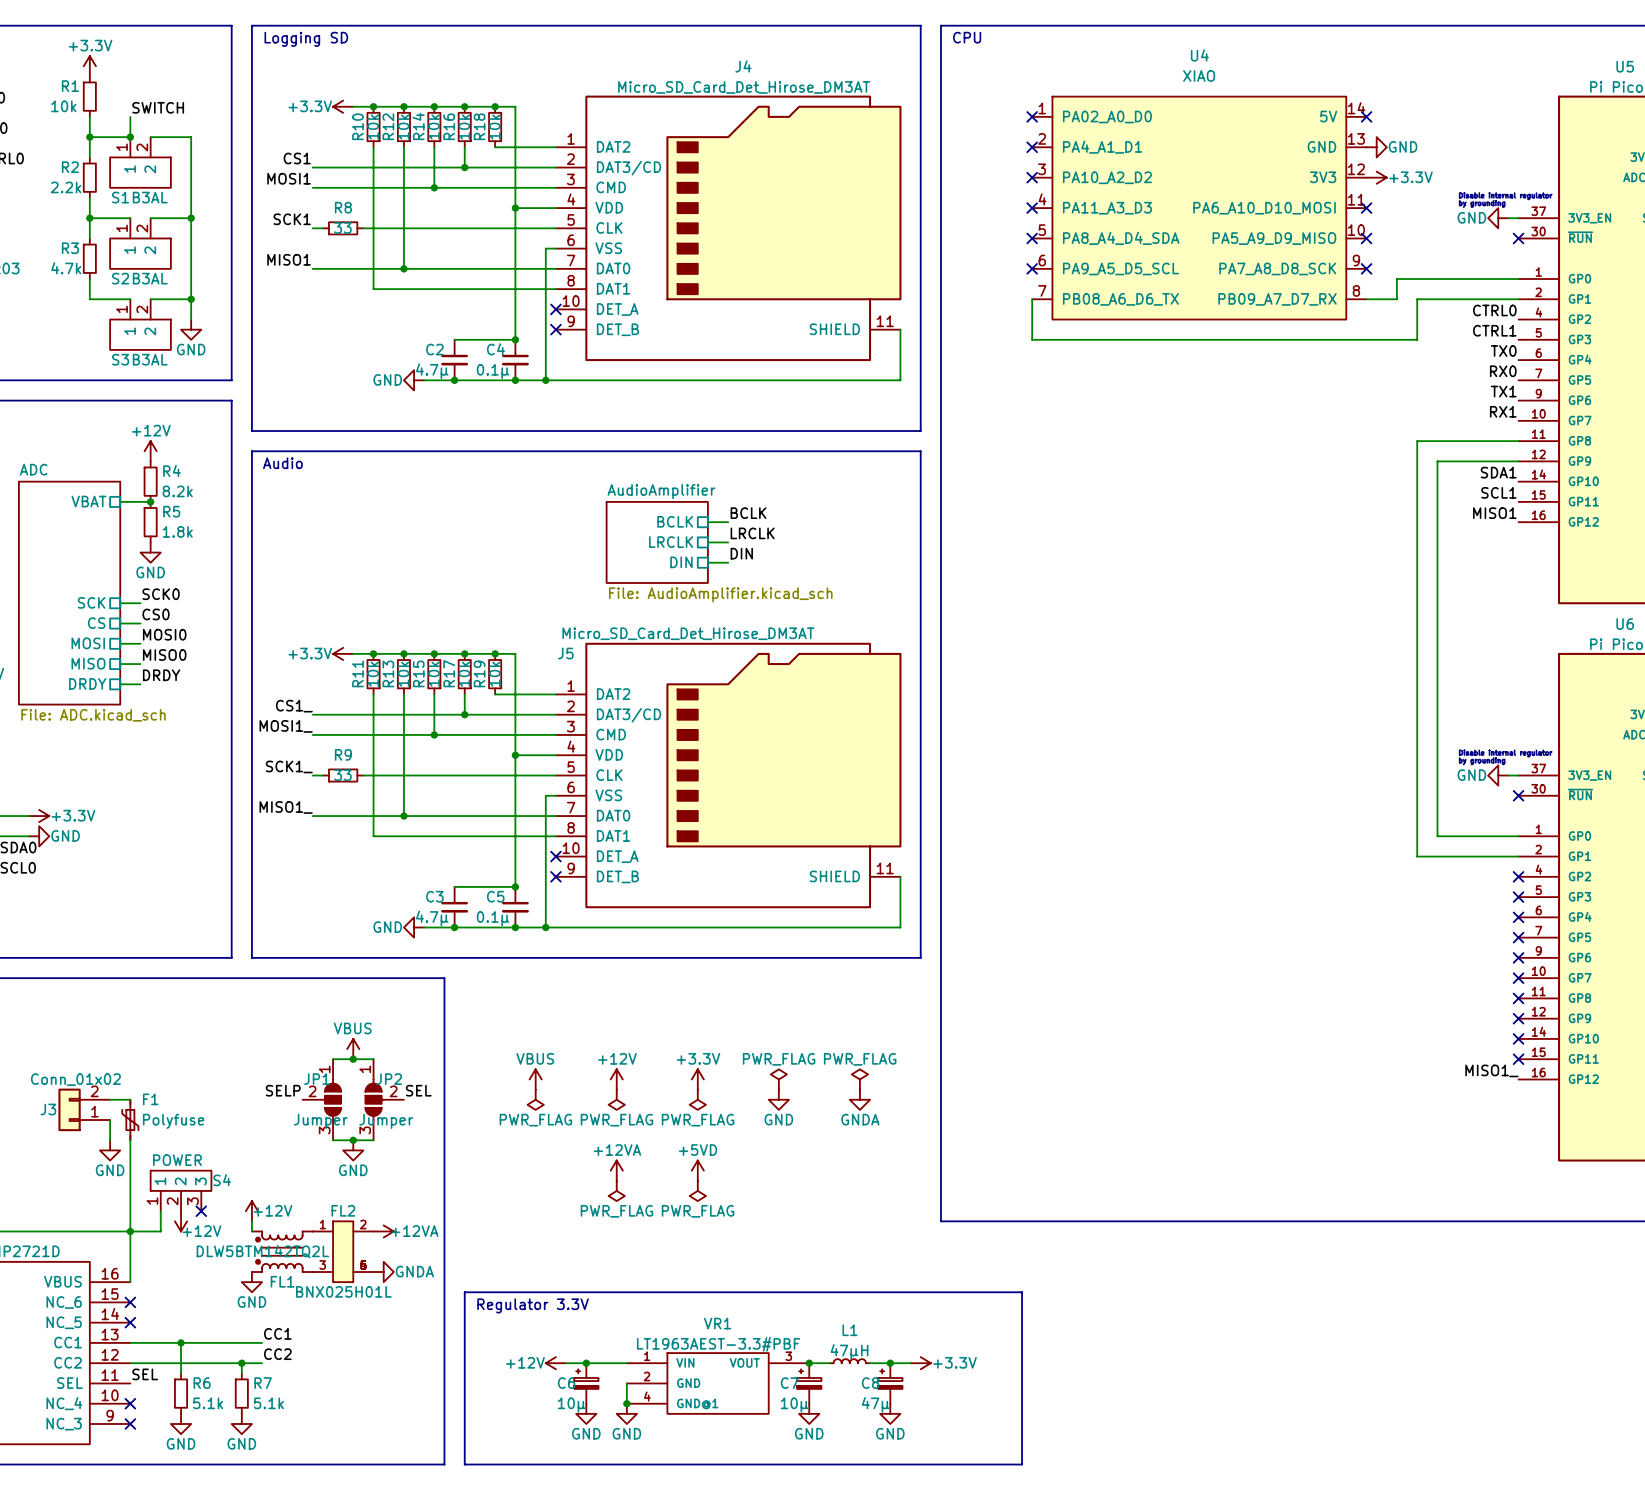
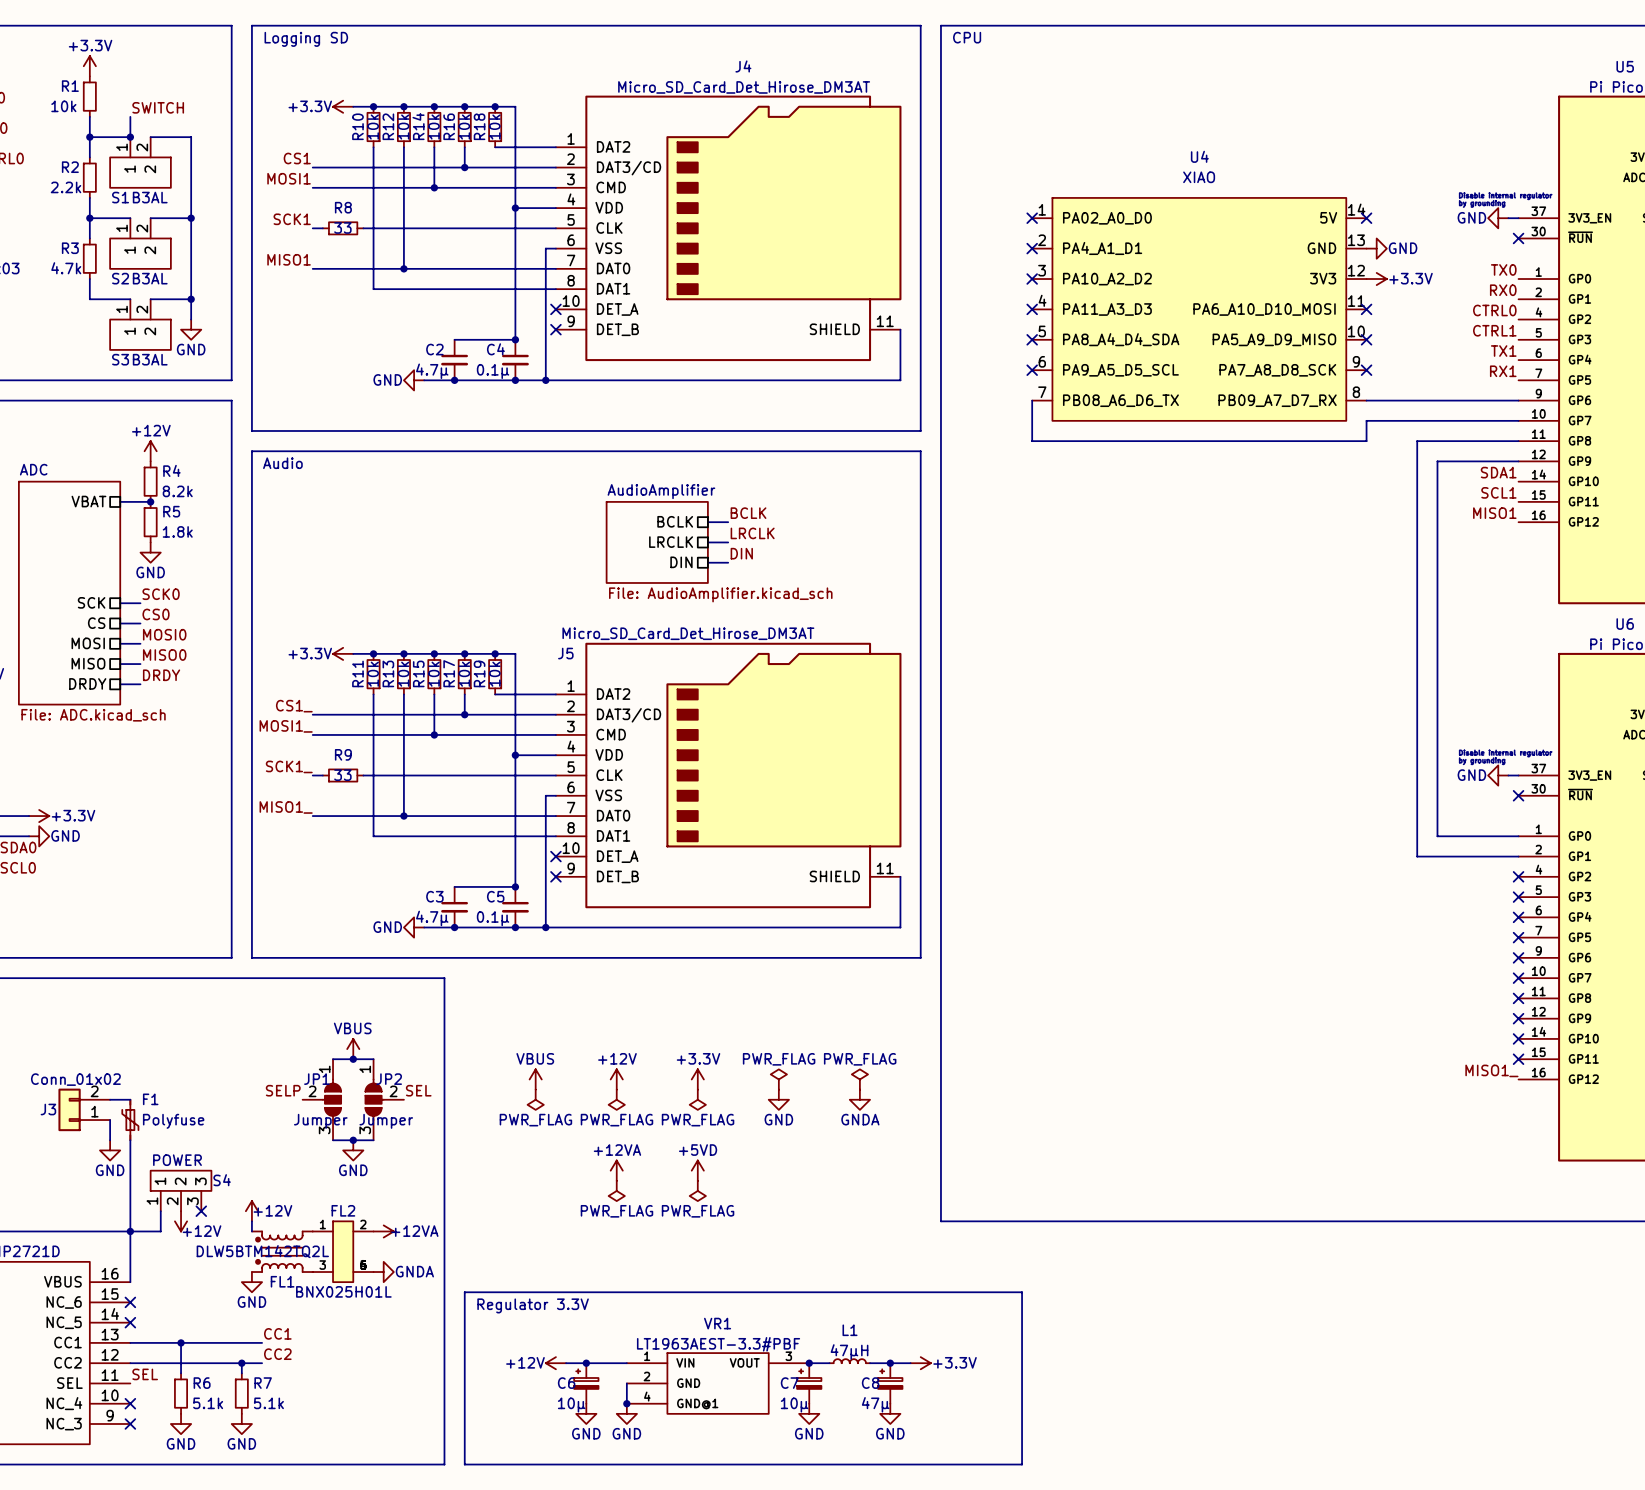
no-connect mark: (1032, 116) -> none
no-connect mark: (1366, 116) -> none
no-connect mark: (1032, 147) -> none
power symbol position: GND (1376, 147) -> GND (1376, 248)
no-connect mark: (1032, 177) -> none
power symbol position: +3.3V (1376, 177) -> +3.3V (1376, 279)
no-connect mark: (1032, 208) -> none
U4 position: (1199, 208) -> (1199, 309)
no-connect mark: (1366, 208) -> none
no-connect mark: none -> (1032, 218)
no-connect mark: none -> (1366, 218)
no-connect mark: (1032, 238) -> none
no-connect mark: (1366, 238) -> none
no-connect mark: none -> (1032, 248)
no-connect mark: (1032, 268) -> none
no-connect mark: (1366, 268) -> none
label: none -> TX0 (1503, 269)
no-connect mark: none -> (1032, 279)
wire: (1518, 279) (1396, 279) (1396, 299) (1366, 299) -> none
label: none -> RX0 (1503, 290)
wire: (1032, 299) (1032, 339) (1417, 339) (1417, 299) (1518, 299) -> none
no-connect mark: none -> (1032, 309)
no-connect mark: none -> (1366, 309)
no-connect mark: none -> (1032, 339)
no-connect mark: none -> (1366, 339)
label: TX0 (1503, 351) -> TX1 (1503, 351)
no-connect mark: none -> (1032, 370)
no-connect mark: none -> (1366, 370)
label: RX0 (1503, 371) -> RX1 (1503, 371)
label: TX1 (1503, 391) -> none
wire: none -> (1032, 400) (1032, 441) (1366, 441) (1366, 420) (1518, 420)
wire: none -> (1366, 400) (1518, 400)
label: RX1 (1503, 411) -> none

